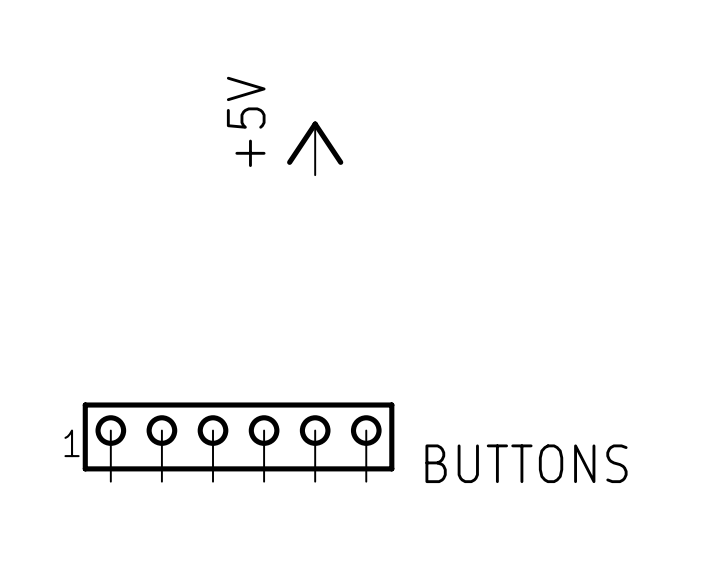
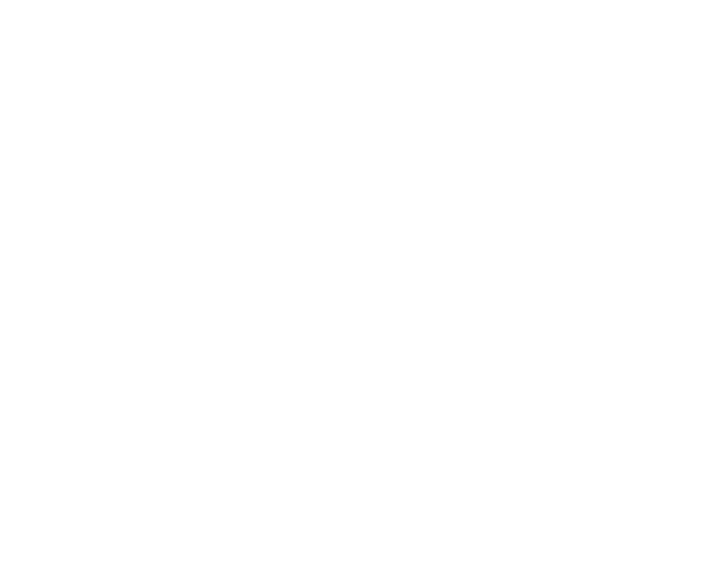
power symbol: +5V (315, 148) -> none
BUTTONS: (238, 442) -> none

